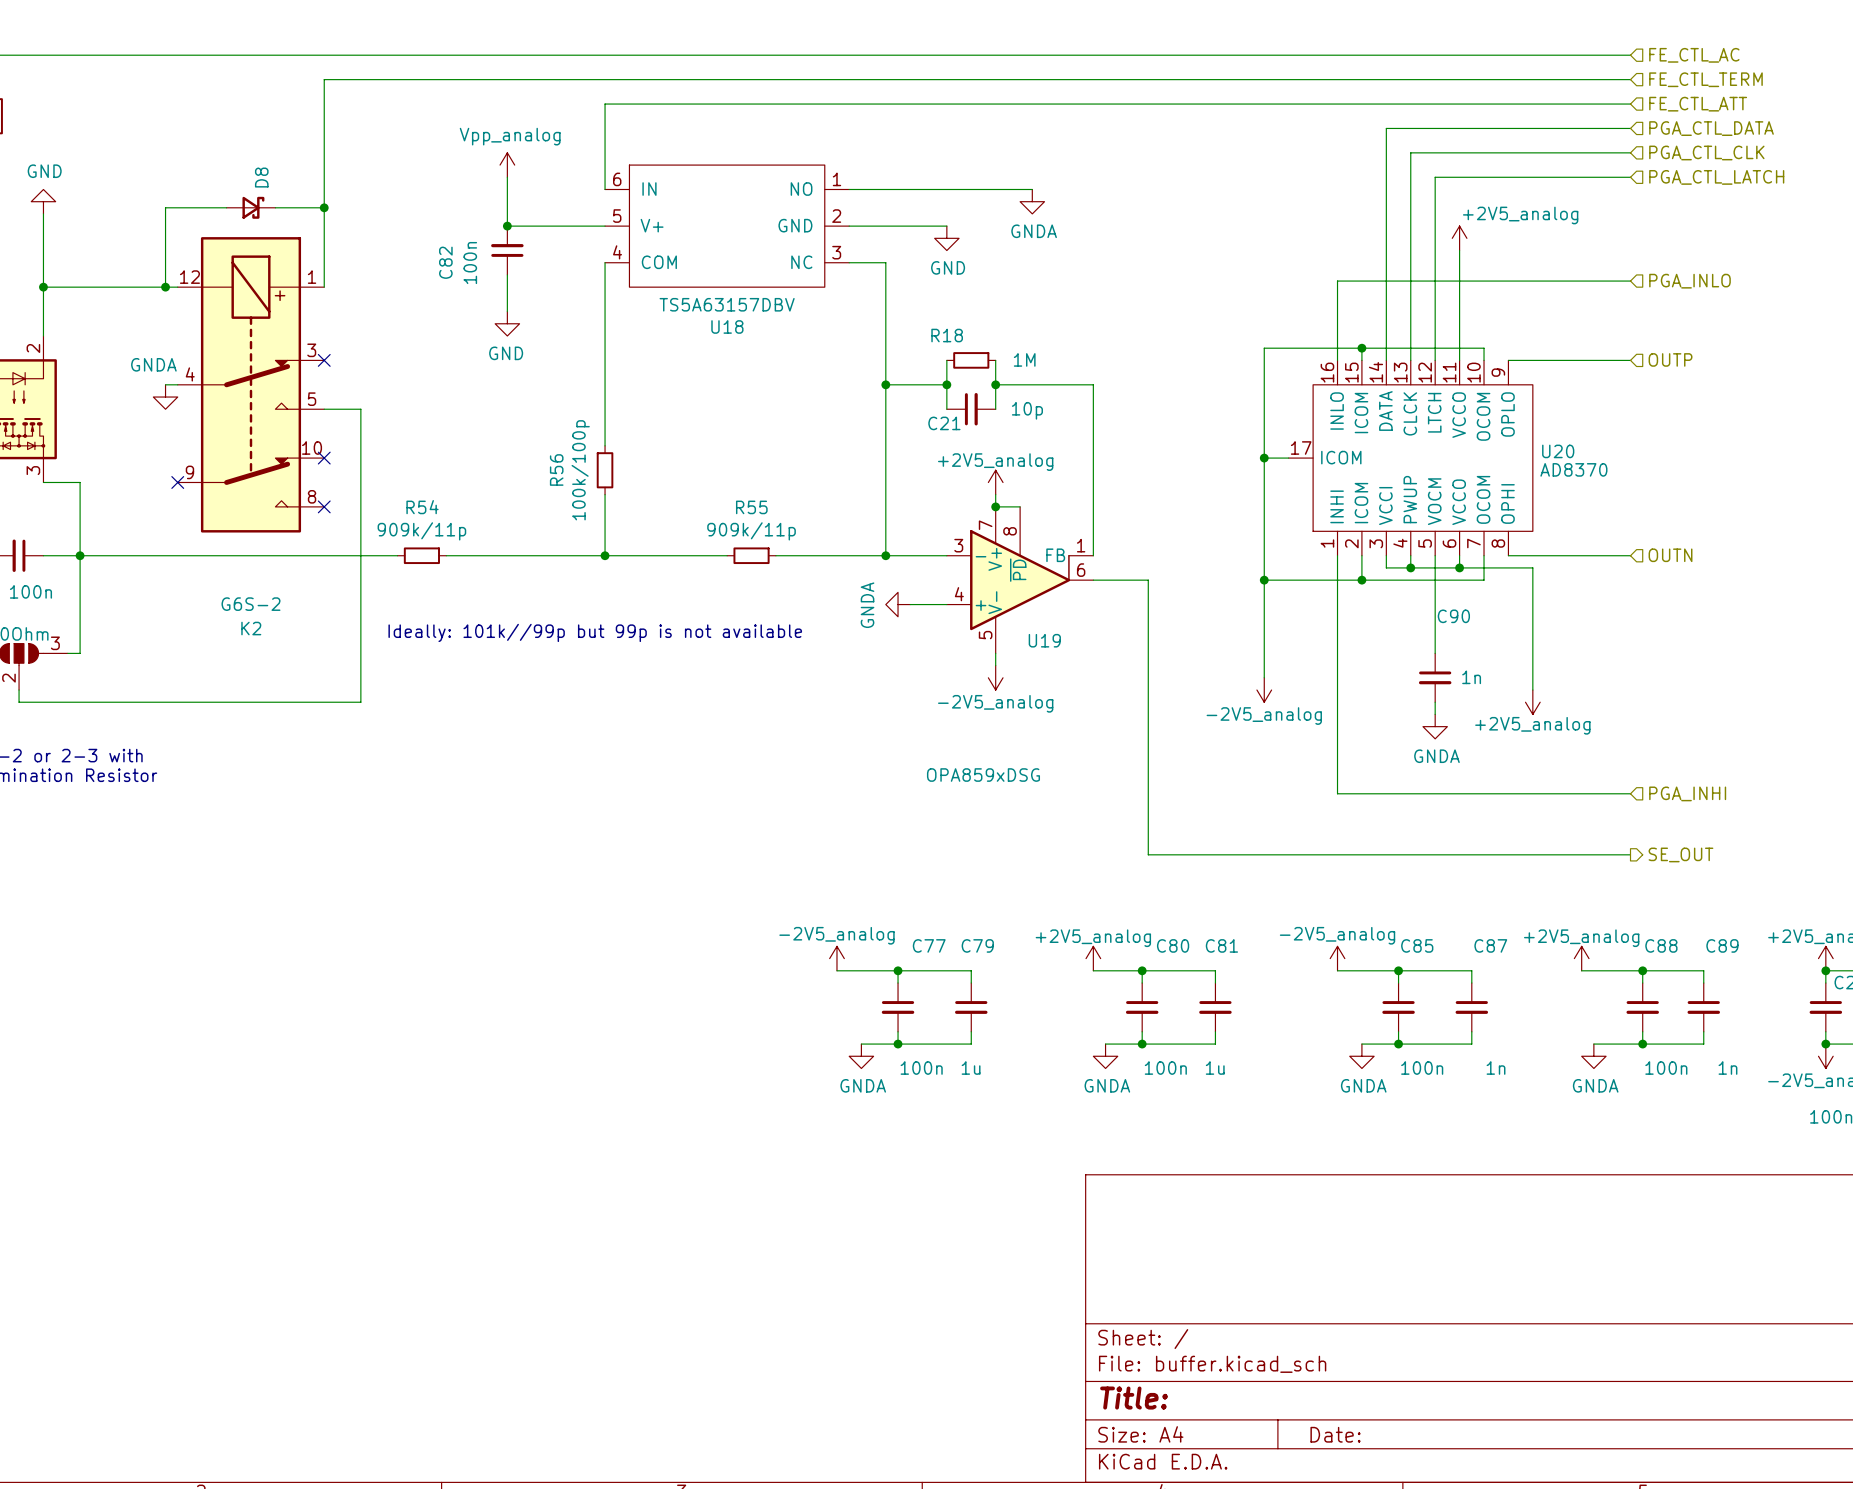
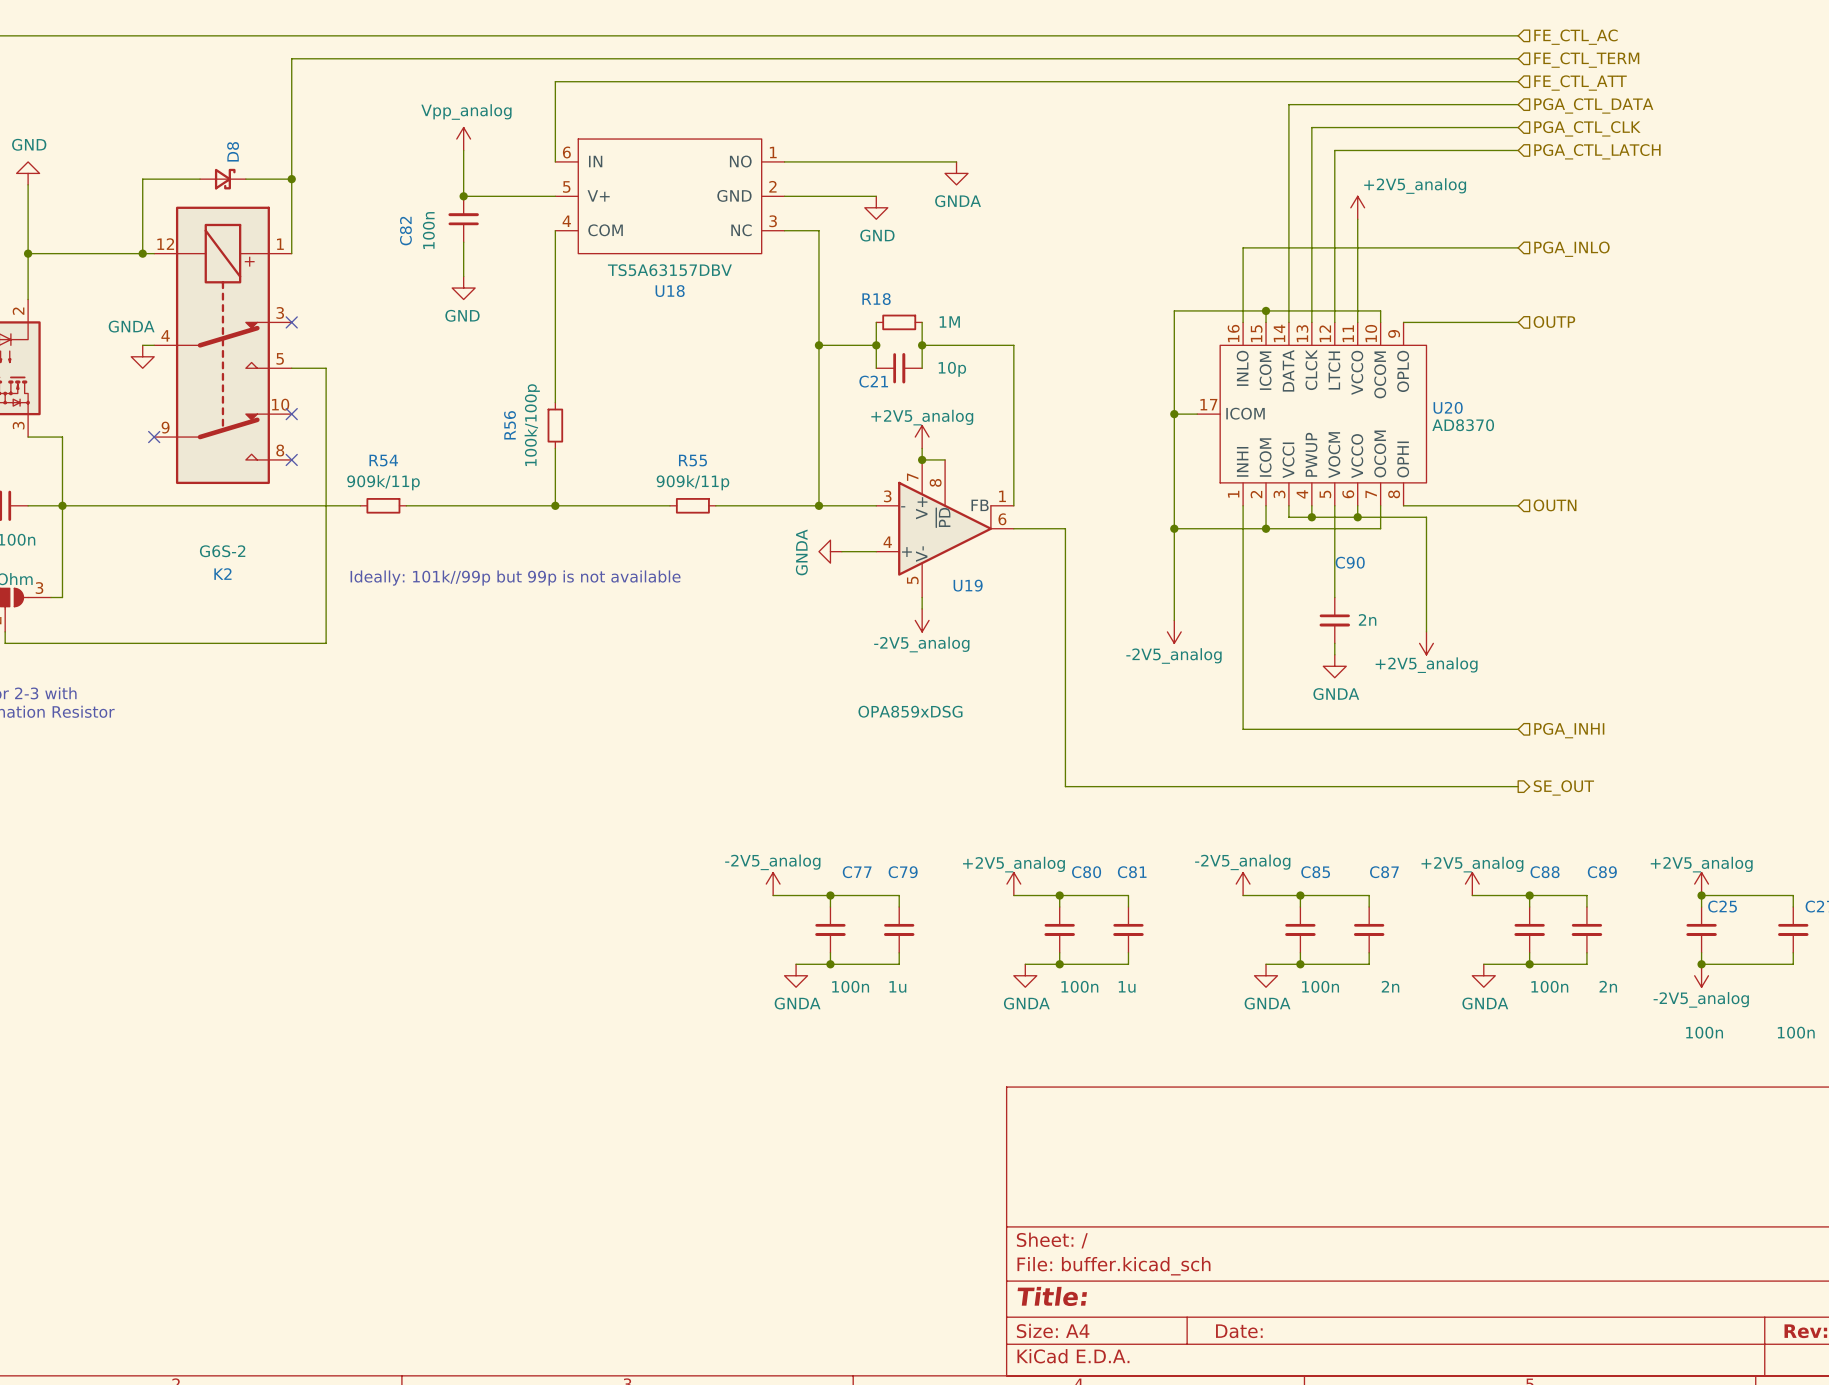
C90 value: 1n (1471, 677) -> 2n (1367, 619)
C87 value: 1n (1496, 1068) -> 2n (1390, 986)
C89 value: 1n (1727, 1068) -> 2n (1608, 986)

